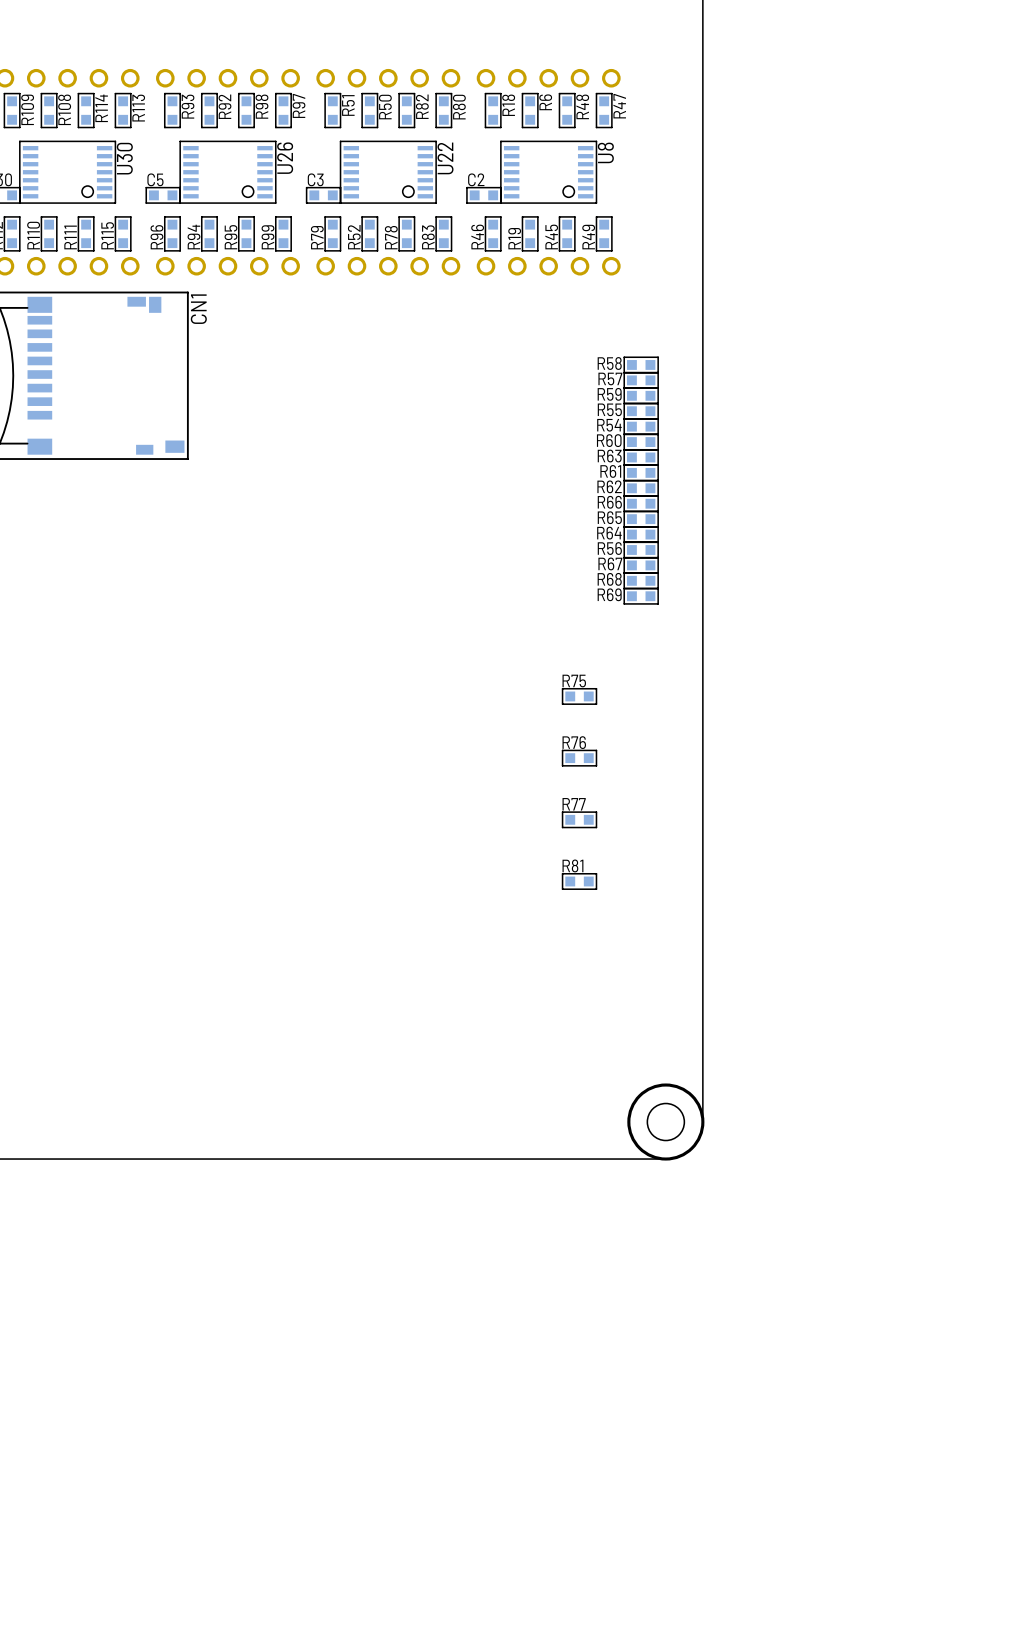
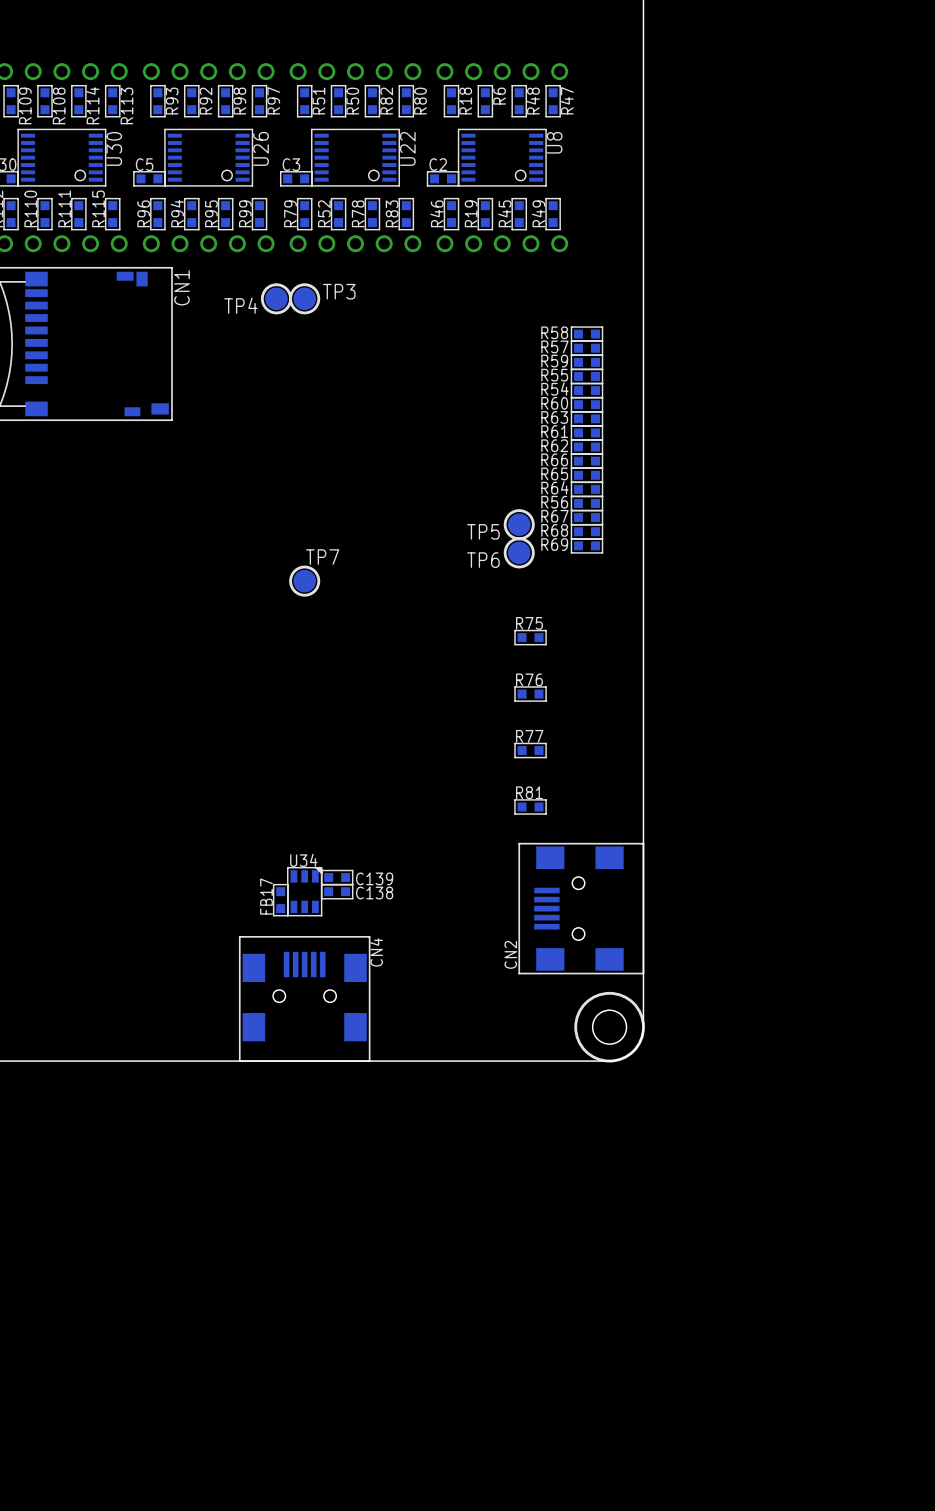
TP4: none -> (276, 298)
TP3: none -> (304, 298)
TP5: none -> (519, 524)
TP6: none -> (519, 552)
TP7: none -> (304, 581)
C139: none -> (337, 877)
U34: none -> (304, 891)
C138: none -> (337, 891)
FB17: none -> (280, 900)
CN2: none -> (581, 908)
CN4: none -> (304, 998)

